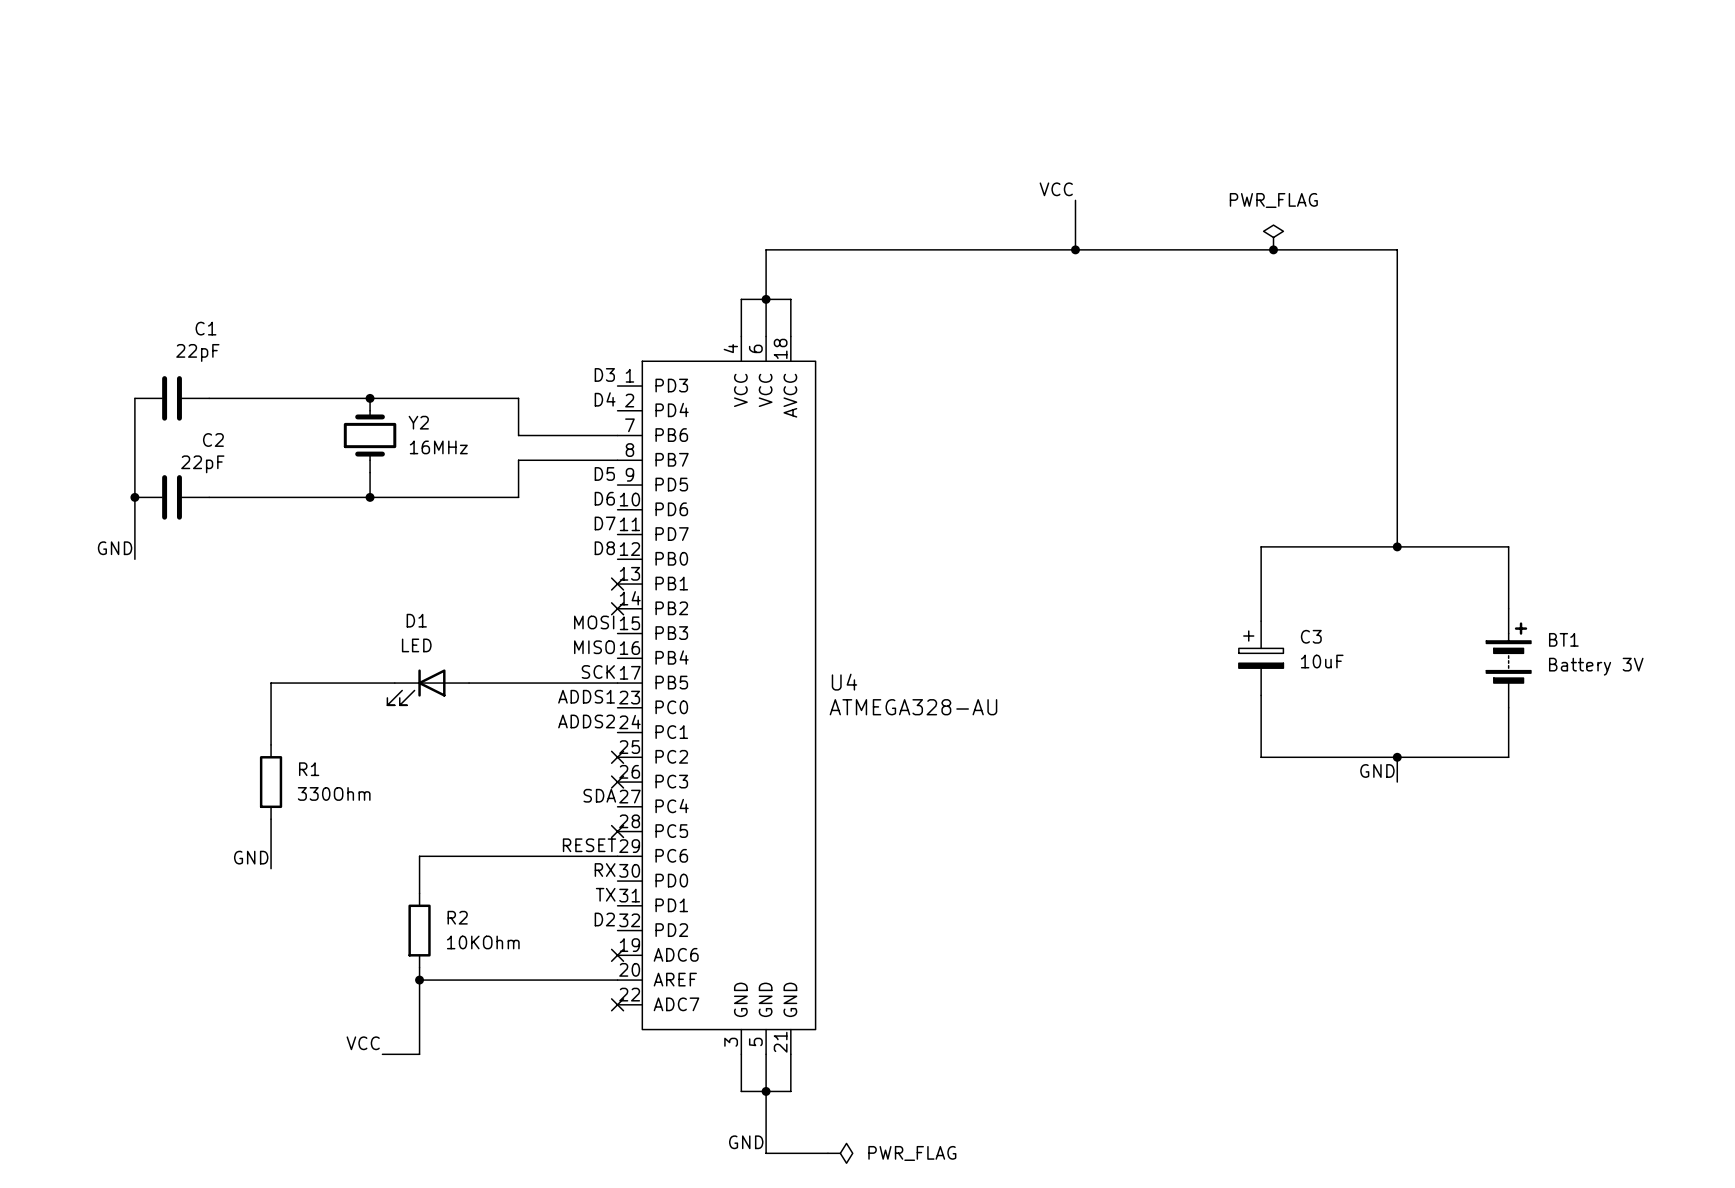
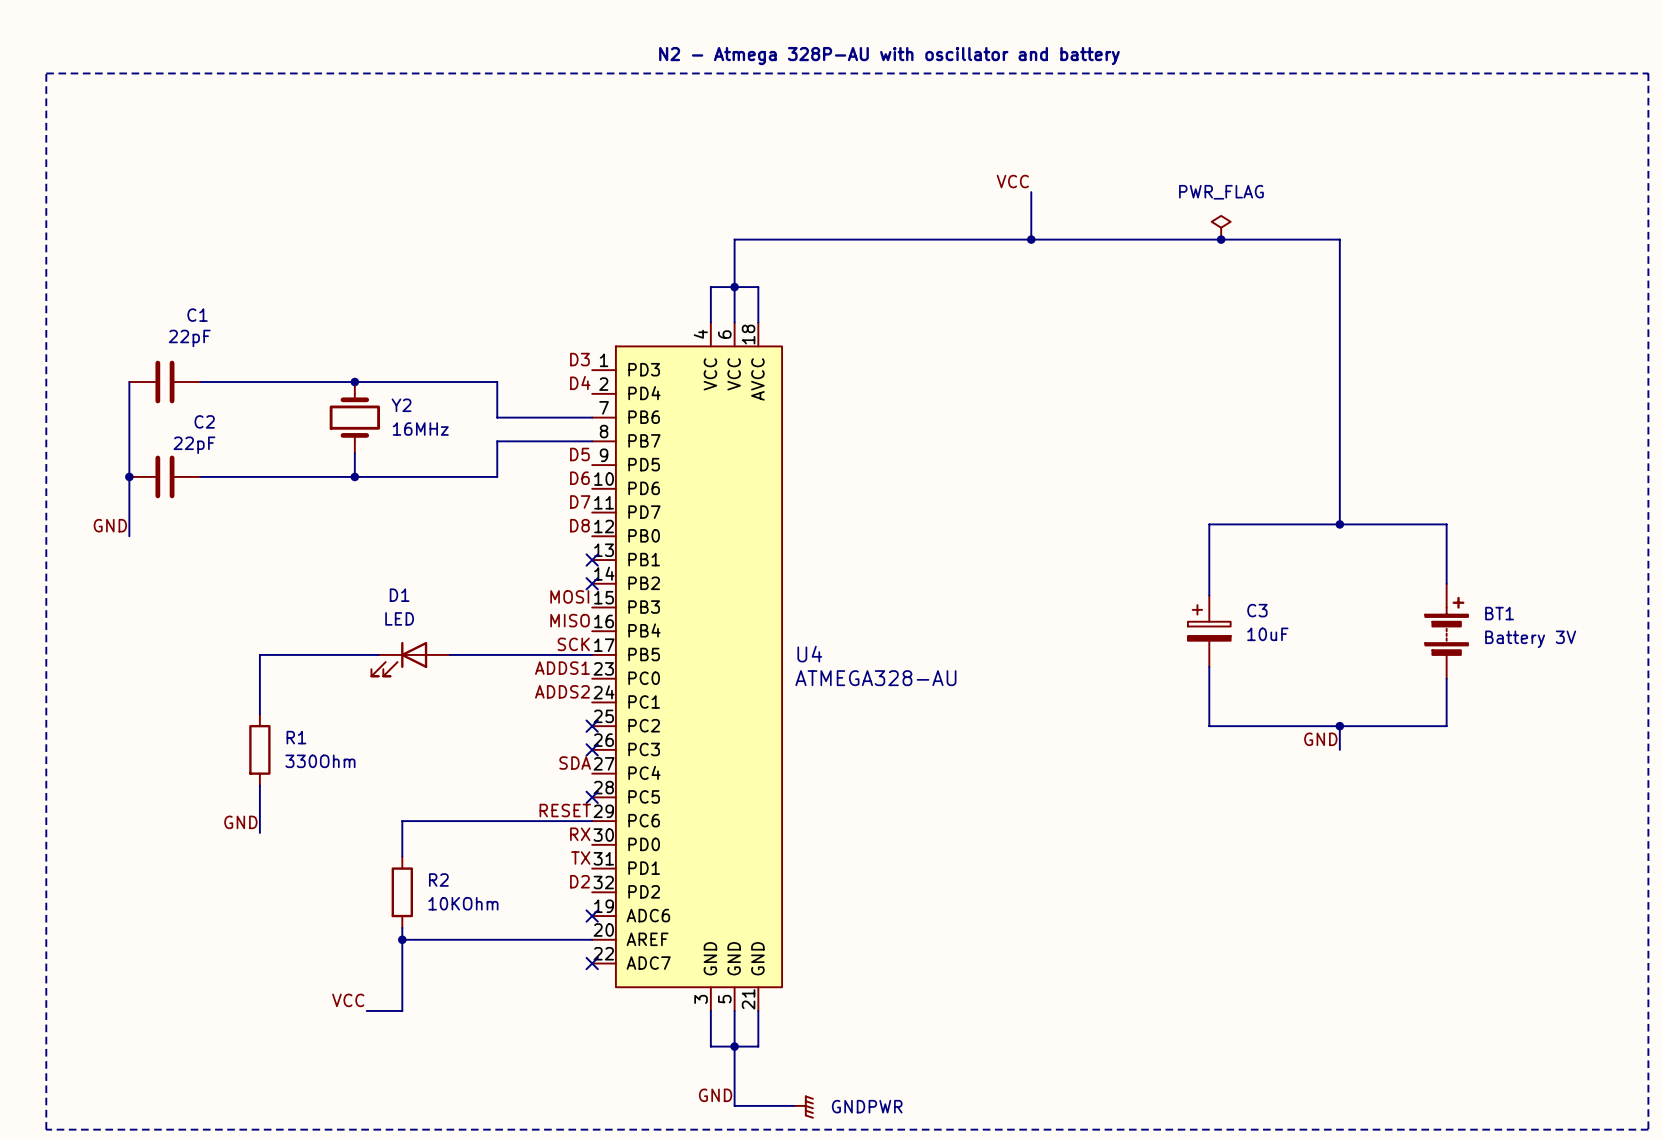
text: none -> N2 - Atmega 328P-AU with oscillator and battery (889, 56)
line: none -> (46, 73) (1648, 73) (1648, 1129) (46, 1129) (46, 73)
power symbol: PWR_FLAG (840, 1153) -> GNDPWR (803, 1107)

